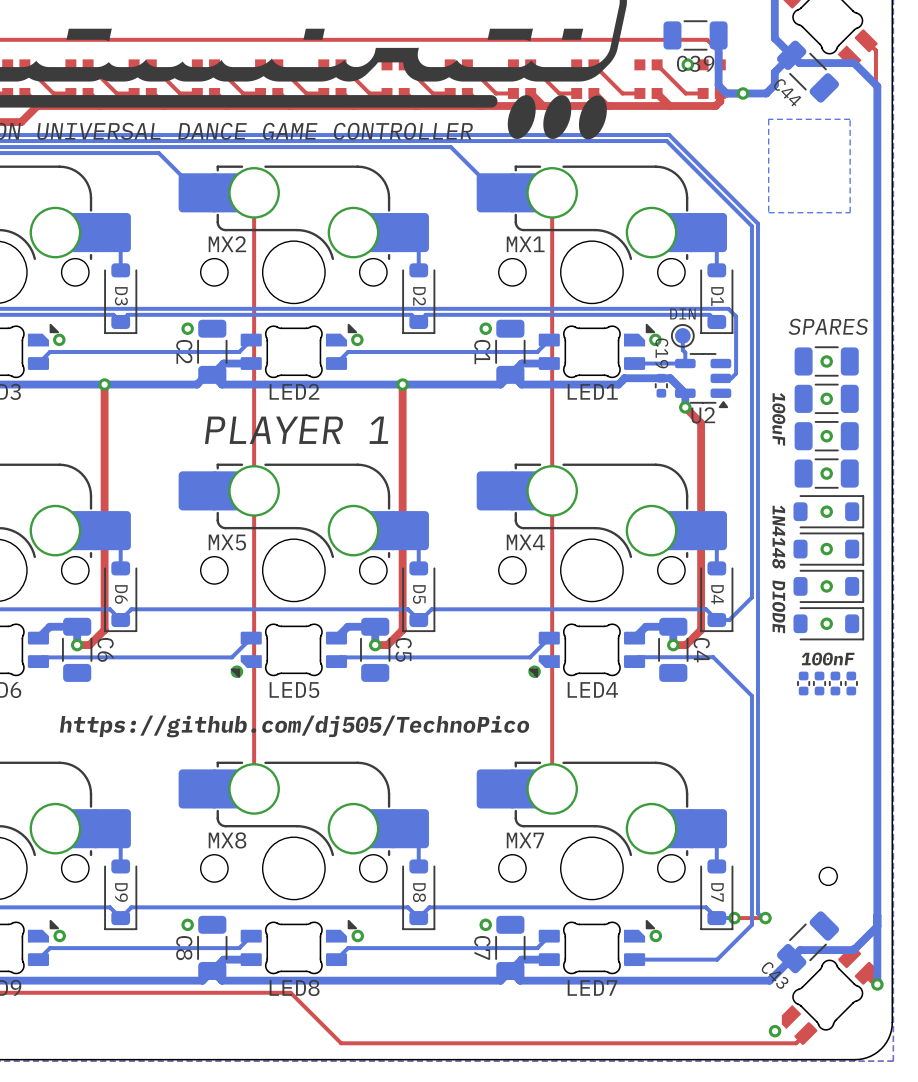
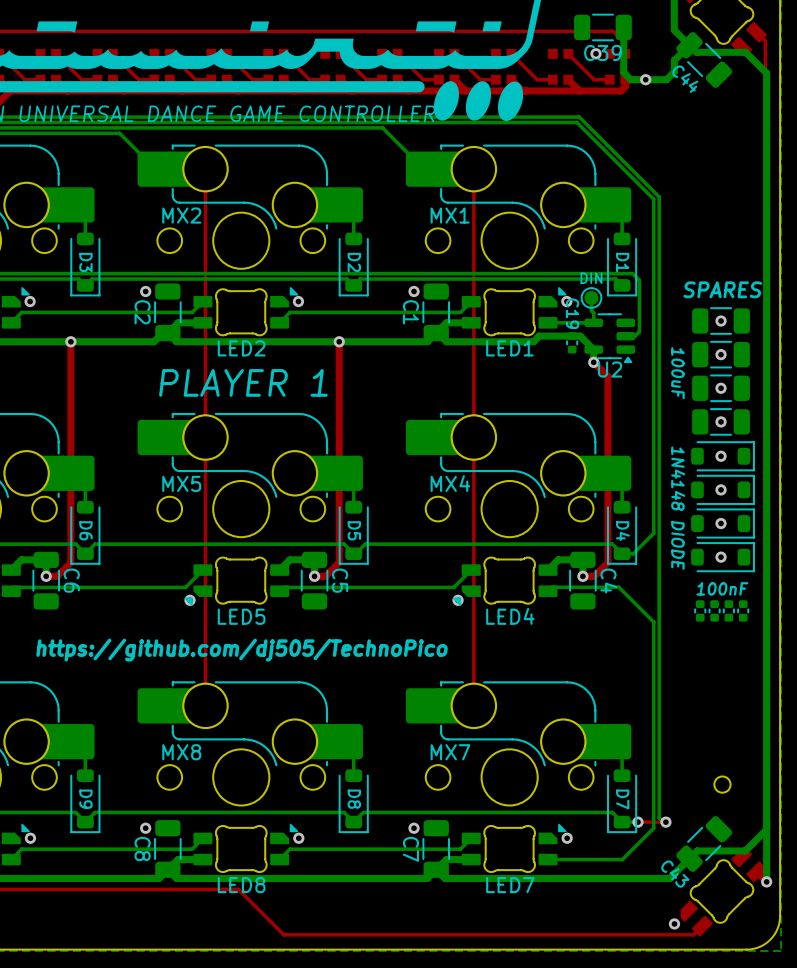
bottom zone outline: (850, 119) (768, 119) (768, 212) (850, 212) (850, 119) -> none

